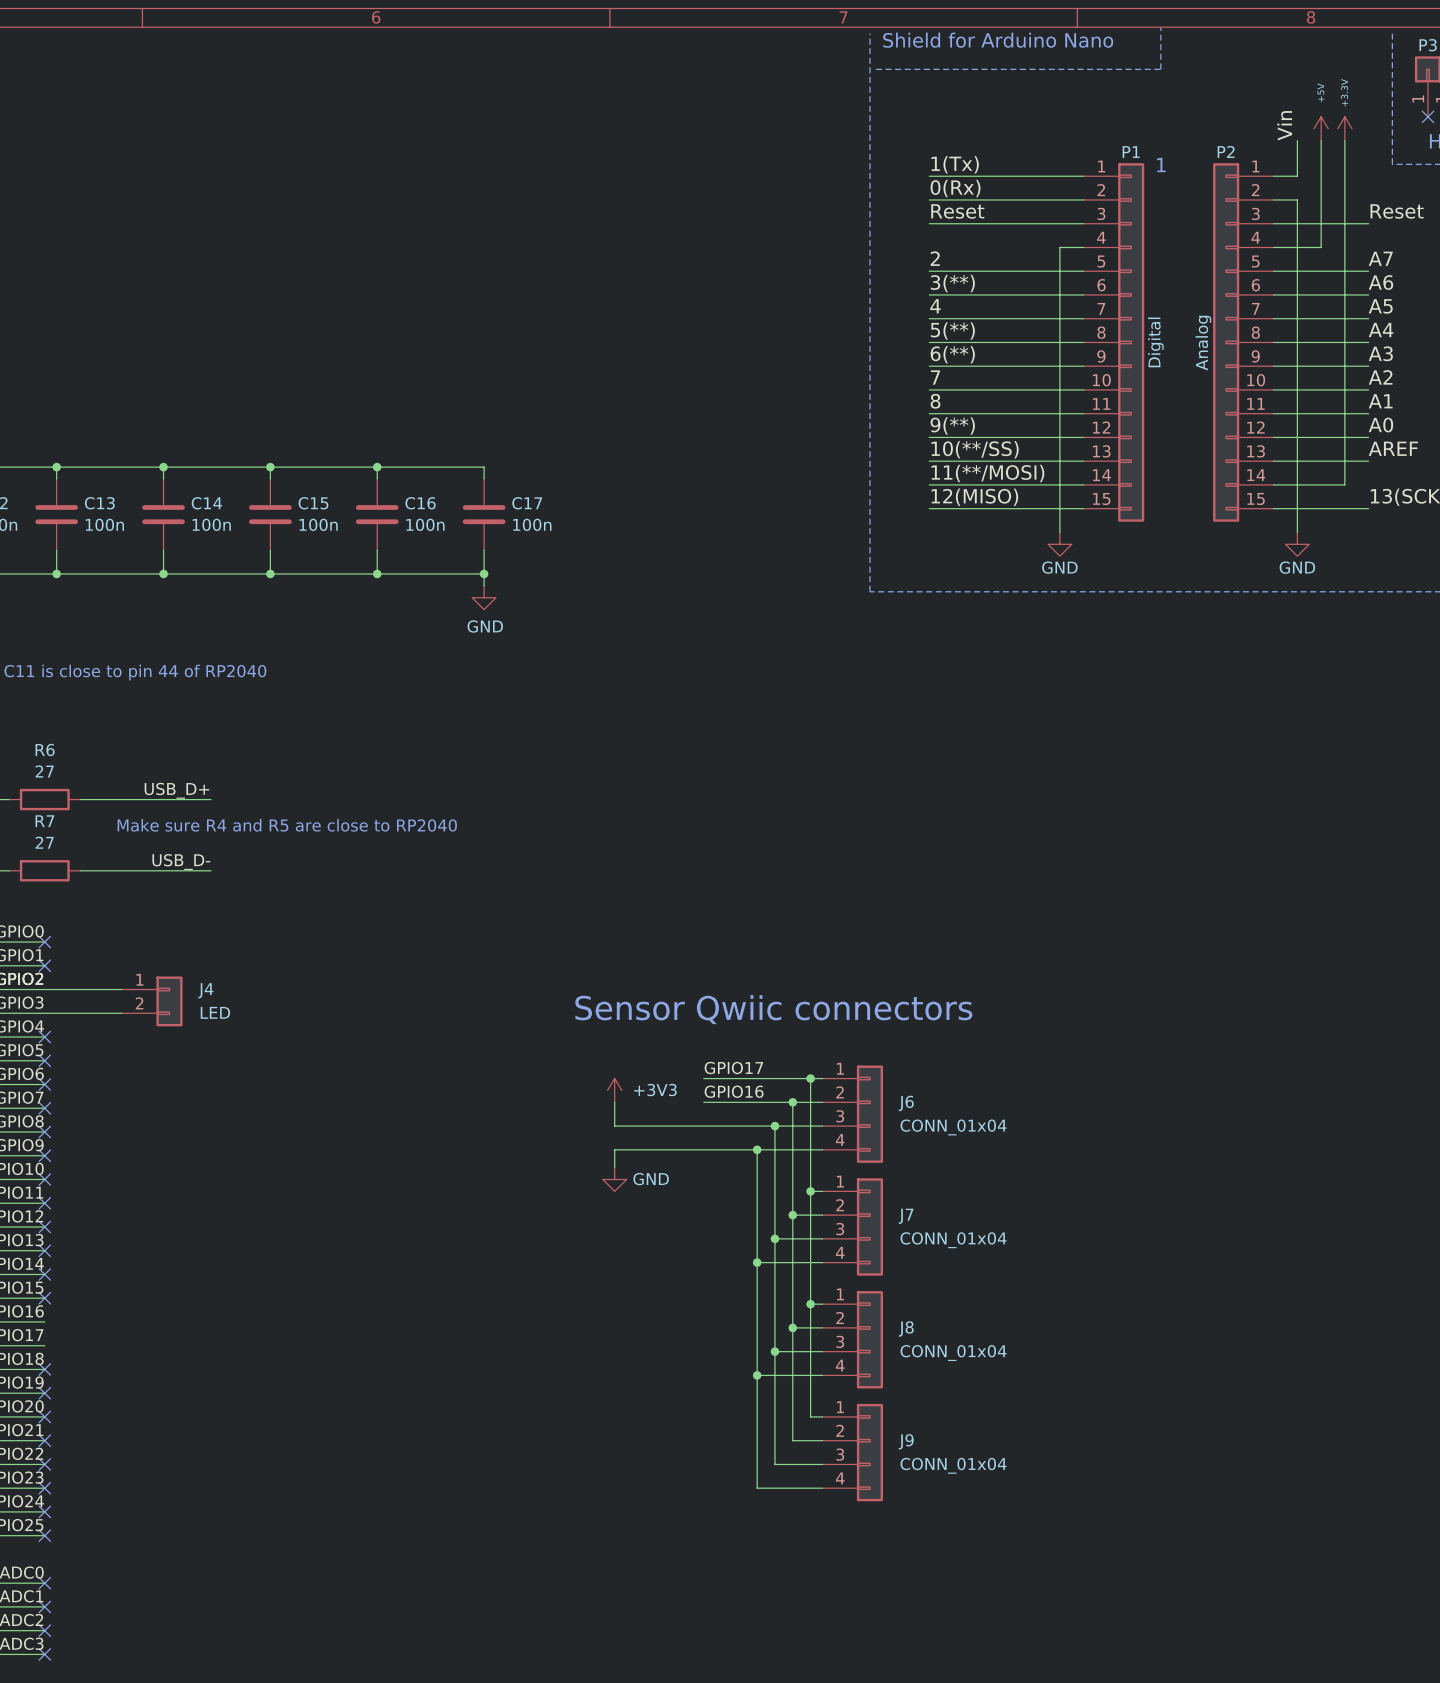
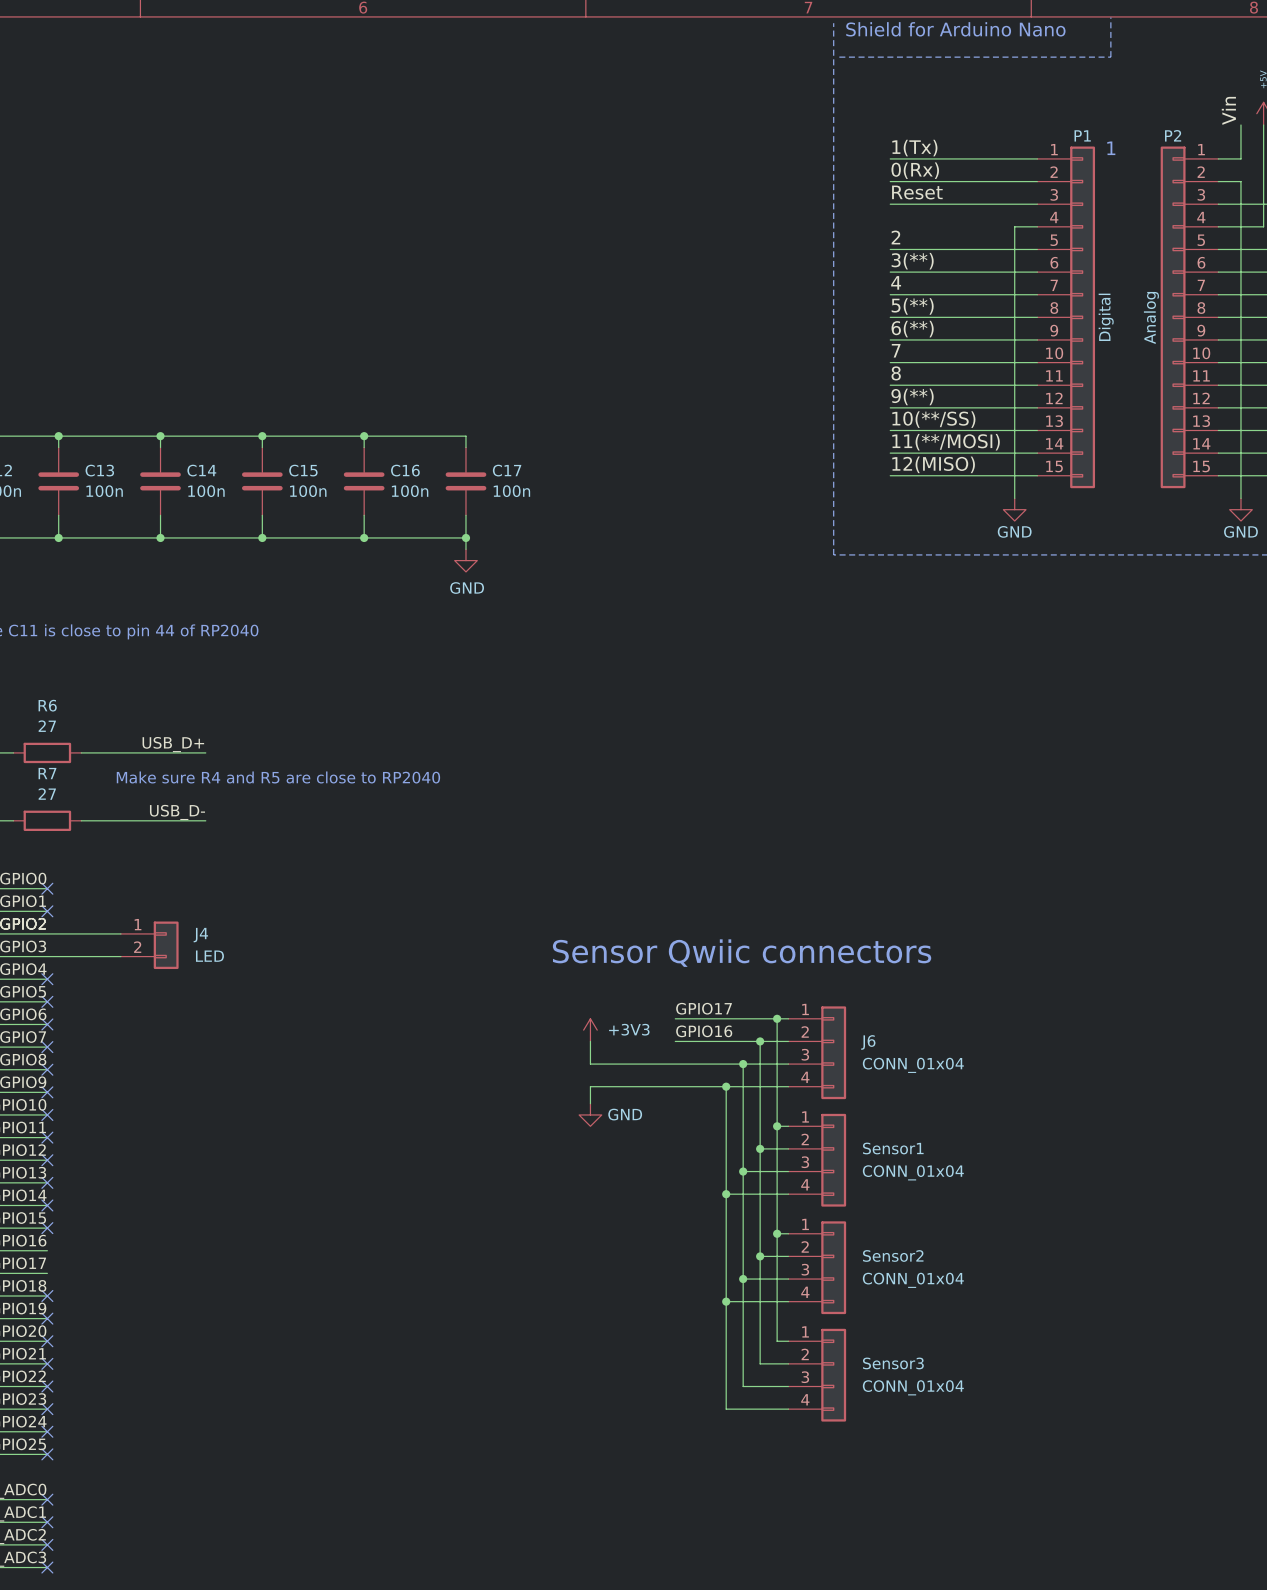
J7 name: J7 (906, 1216) -> Sensor1 (893, 1148)
J8 name: J8 (906, 1328) -> Sensor2 (893, 1255)
J9 name: J9 (906, 1441) -> Sensor3 (893, 1363)

